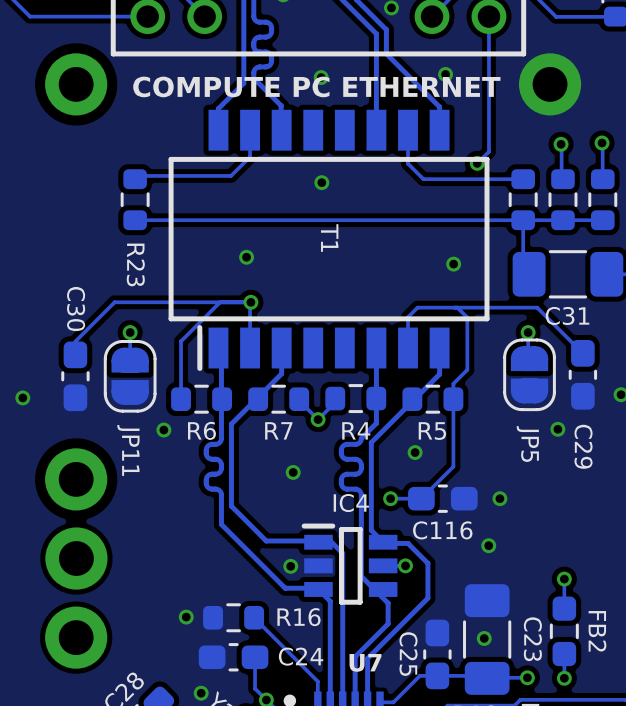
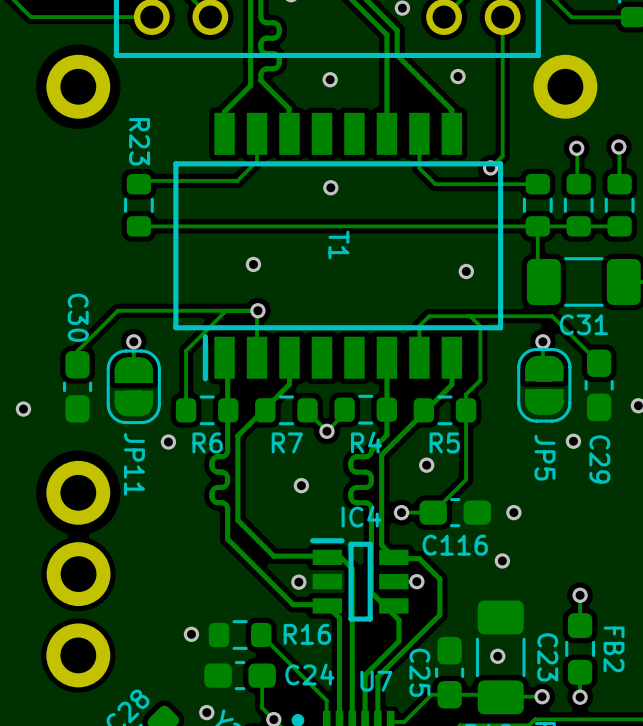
text: COMPUTE PC ETHERNET (316, 86) -> none
R23 name position: R23 (135, 264) -> R23 (139, 141)

